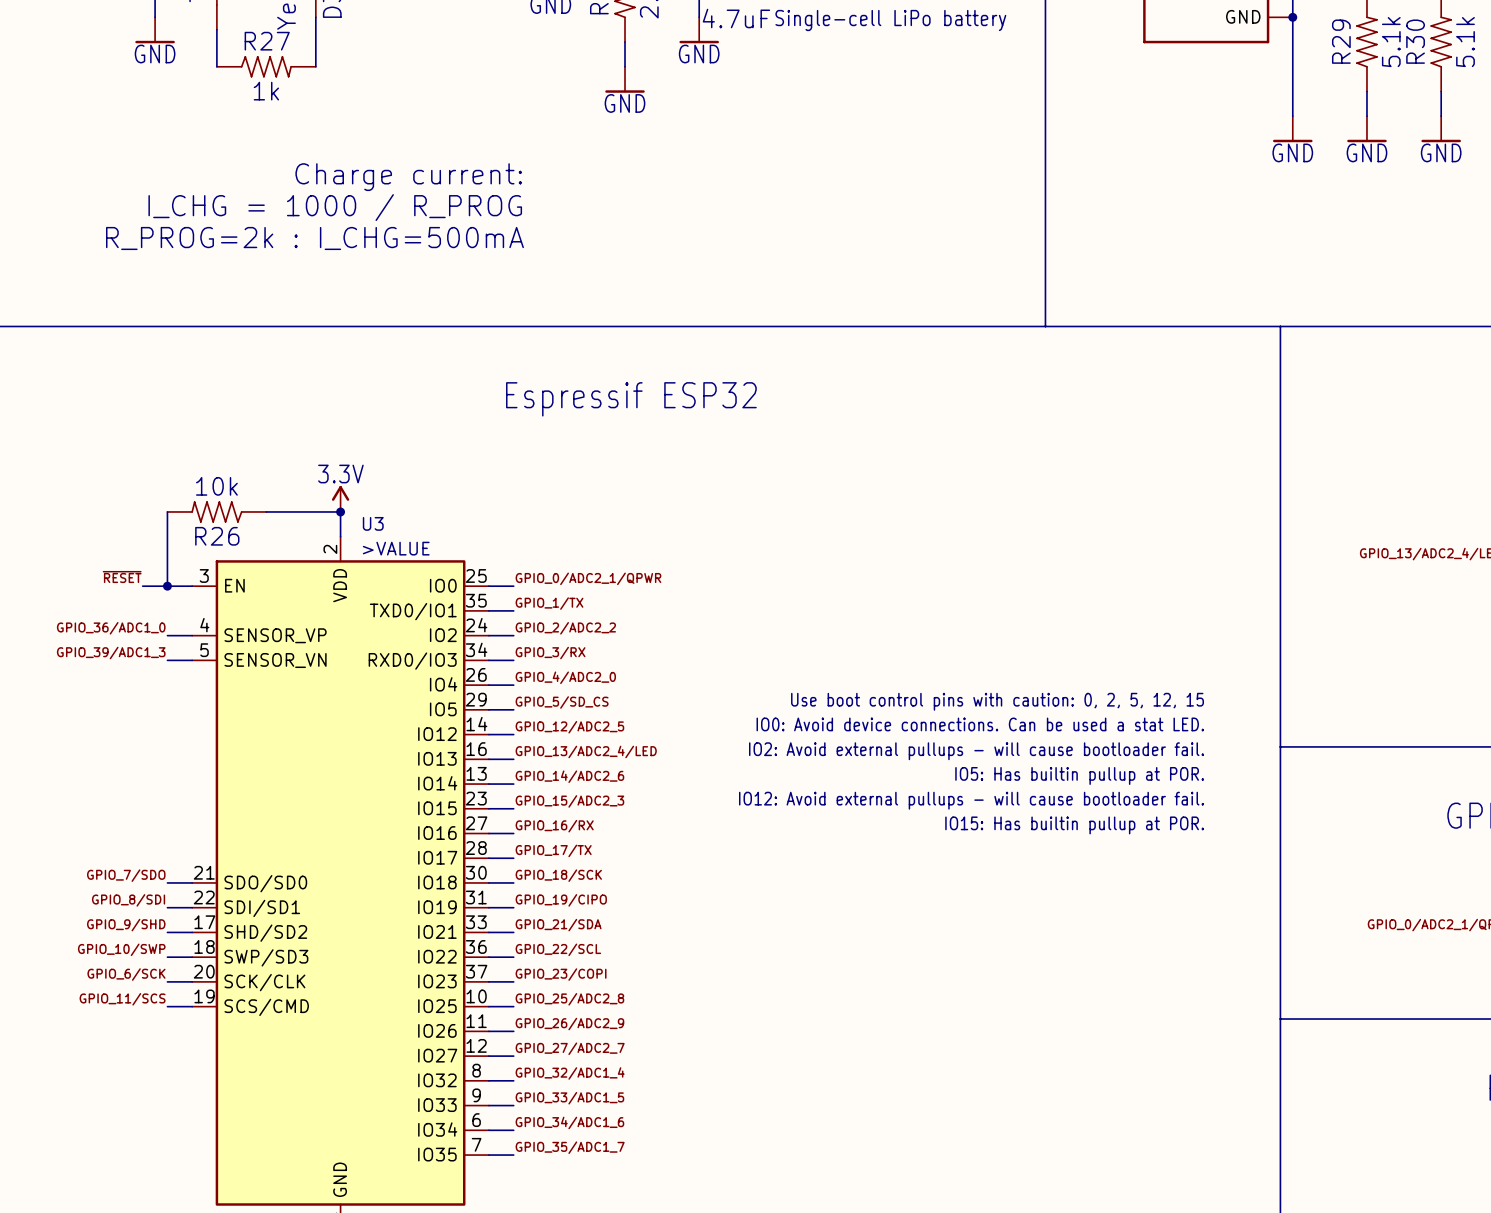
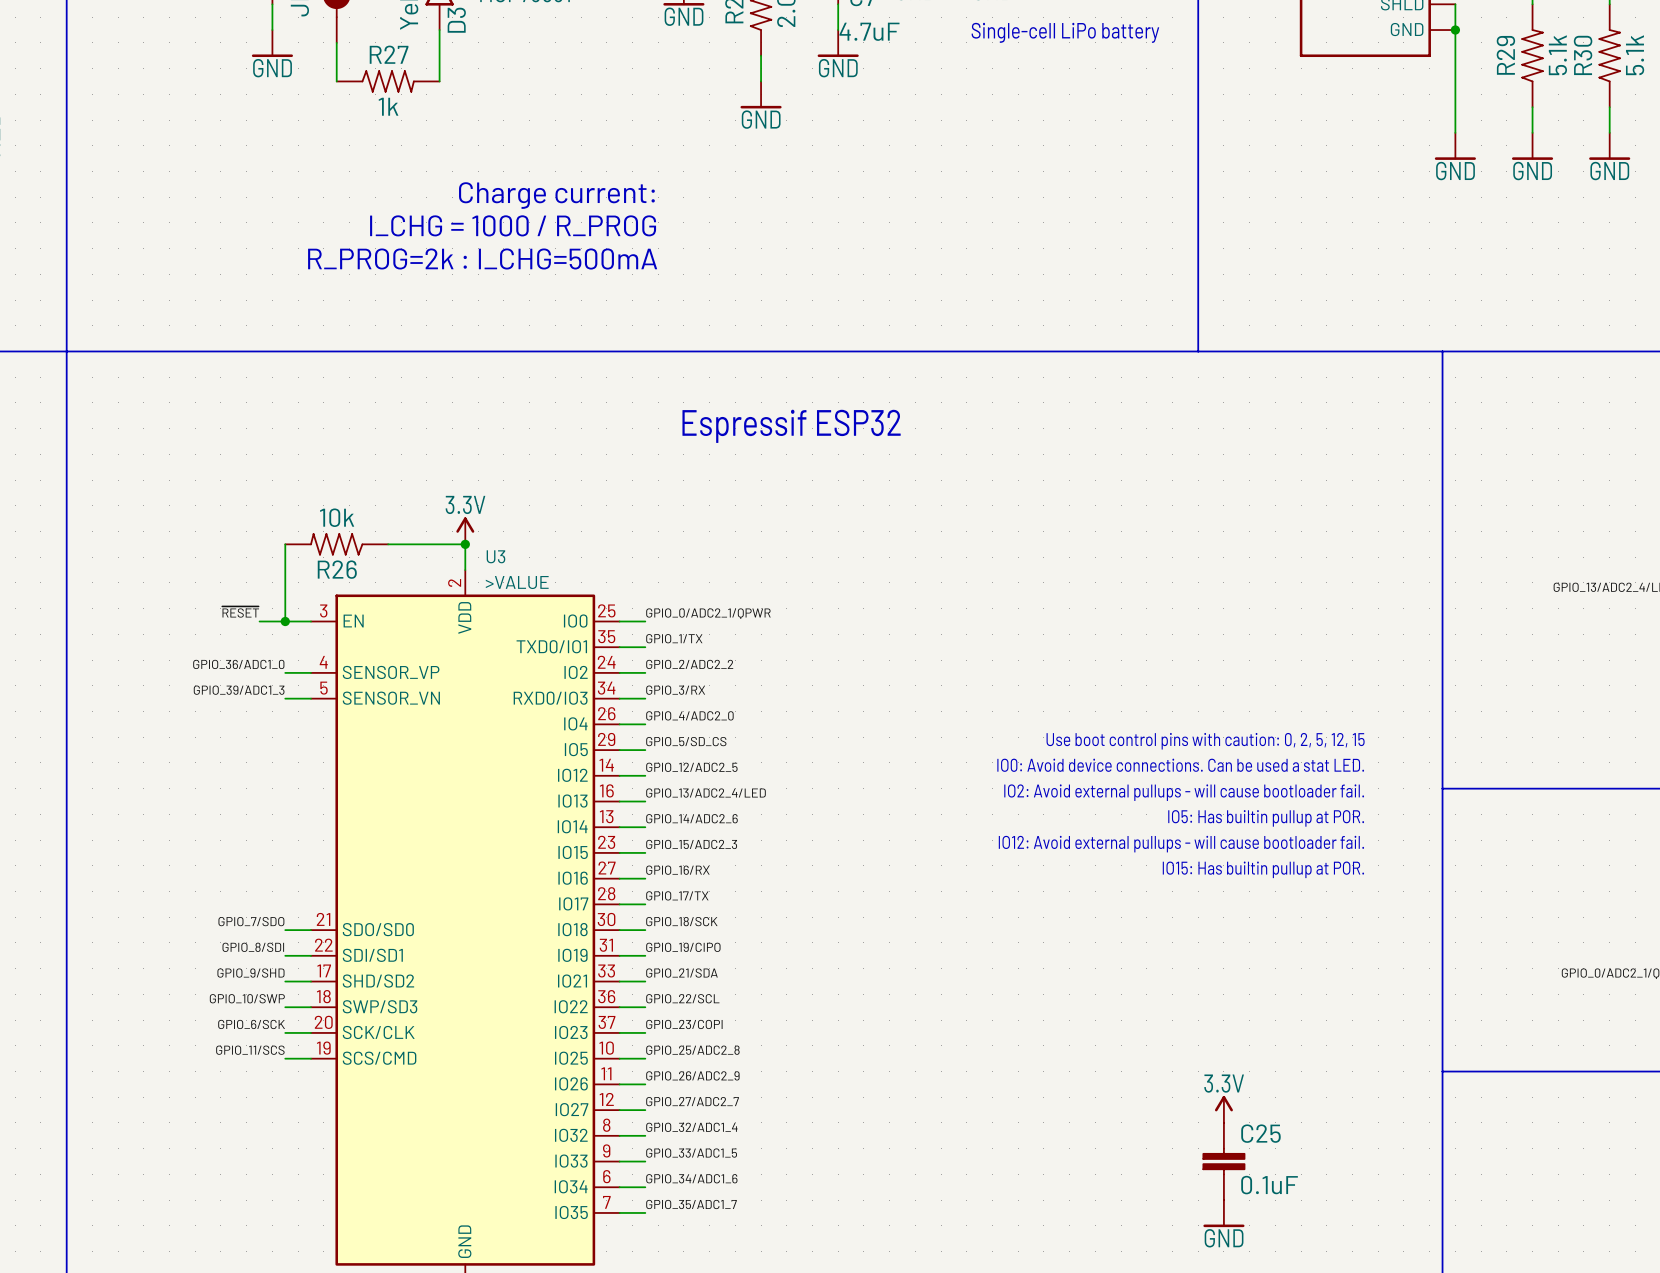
power symbol: none -> 3.3V (1223, 1109)
C25: none -> 0.1uF (1223, 1161)
power symbol: none -> GND (1223, 1213)

